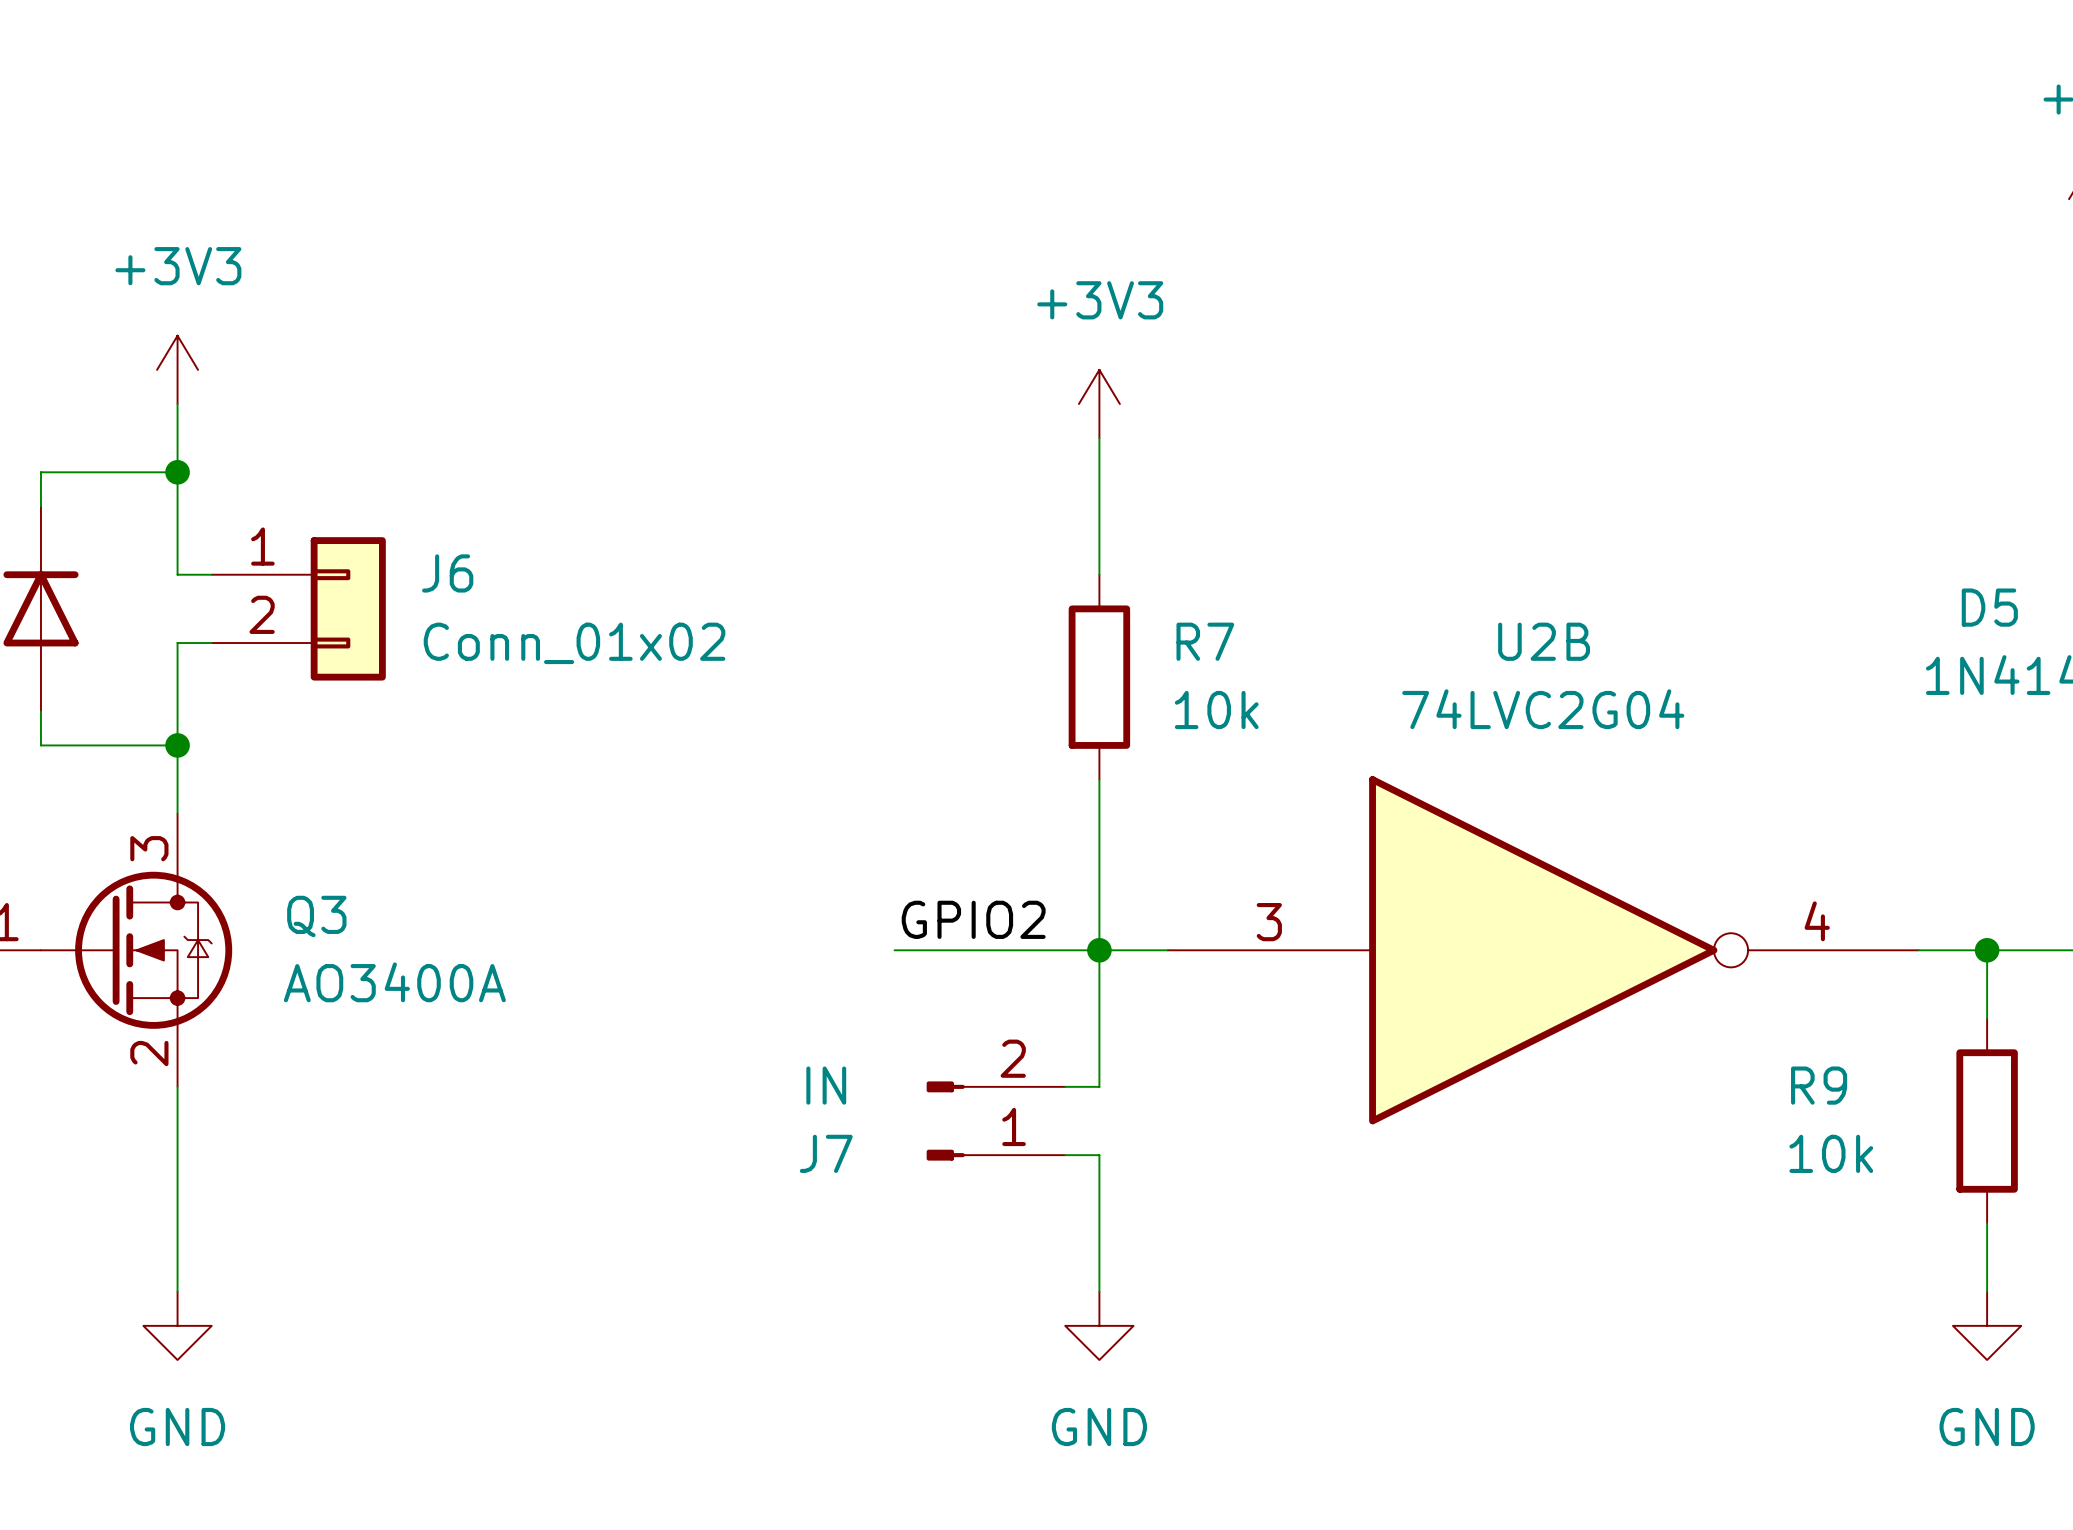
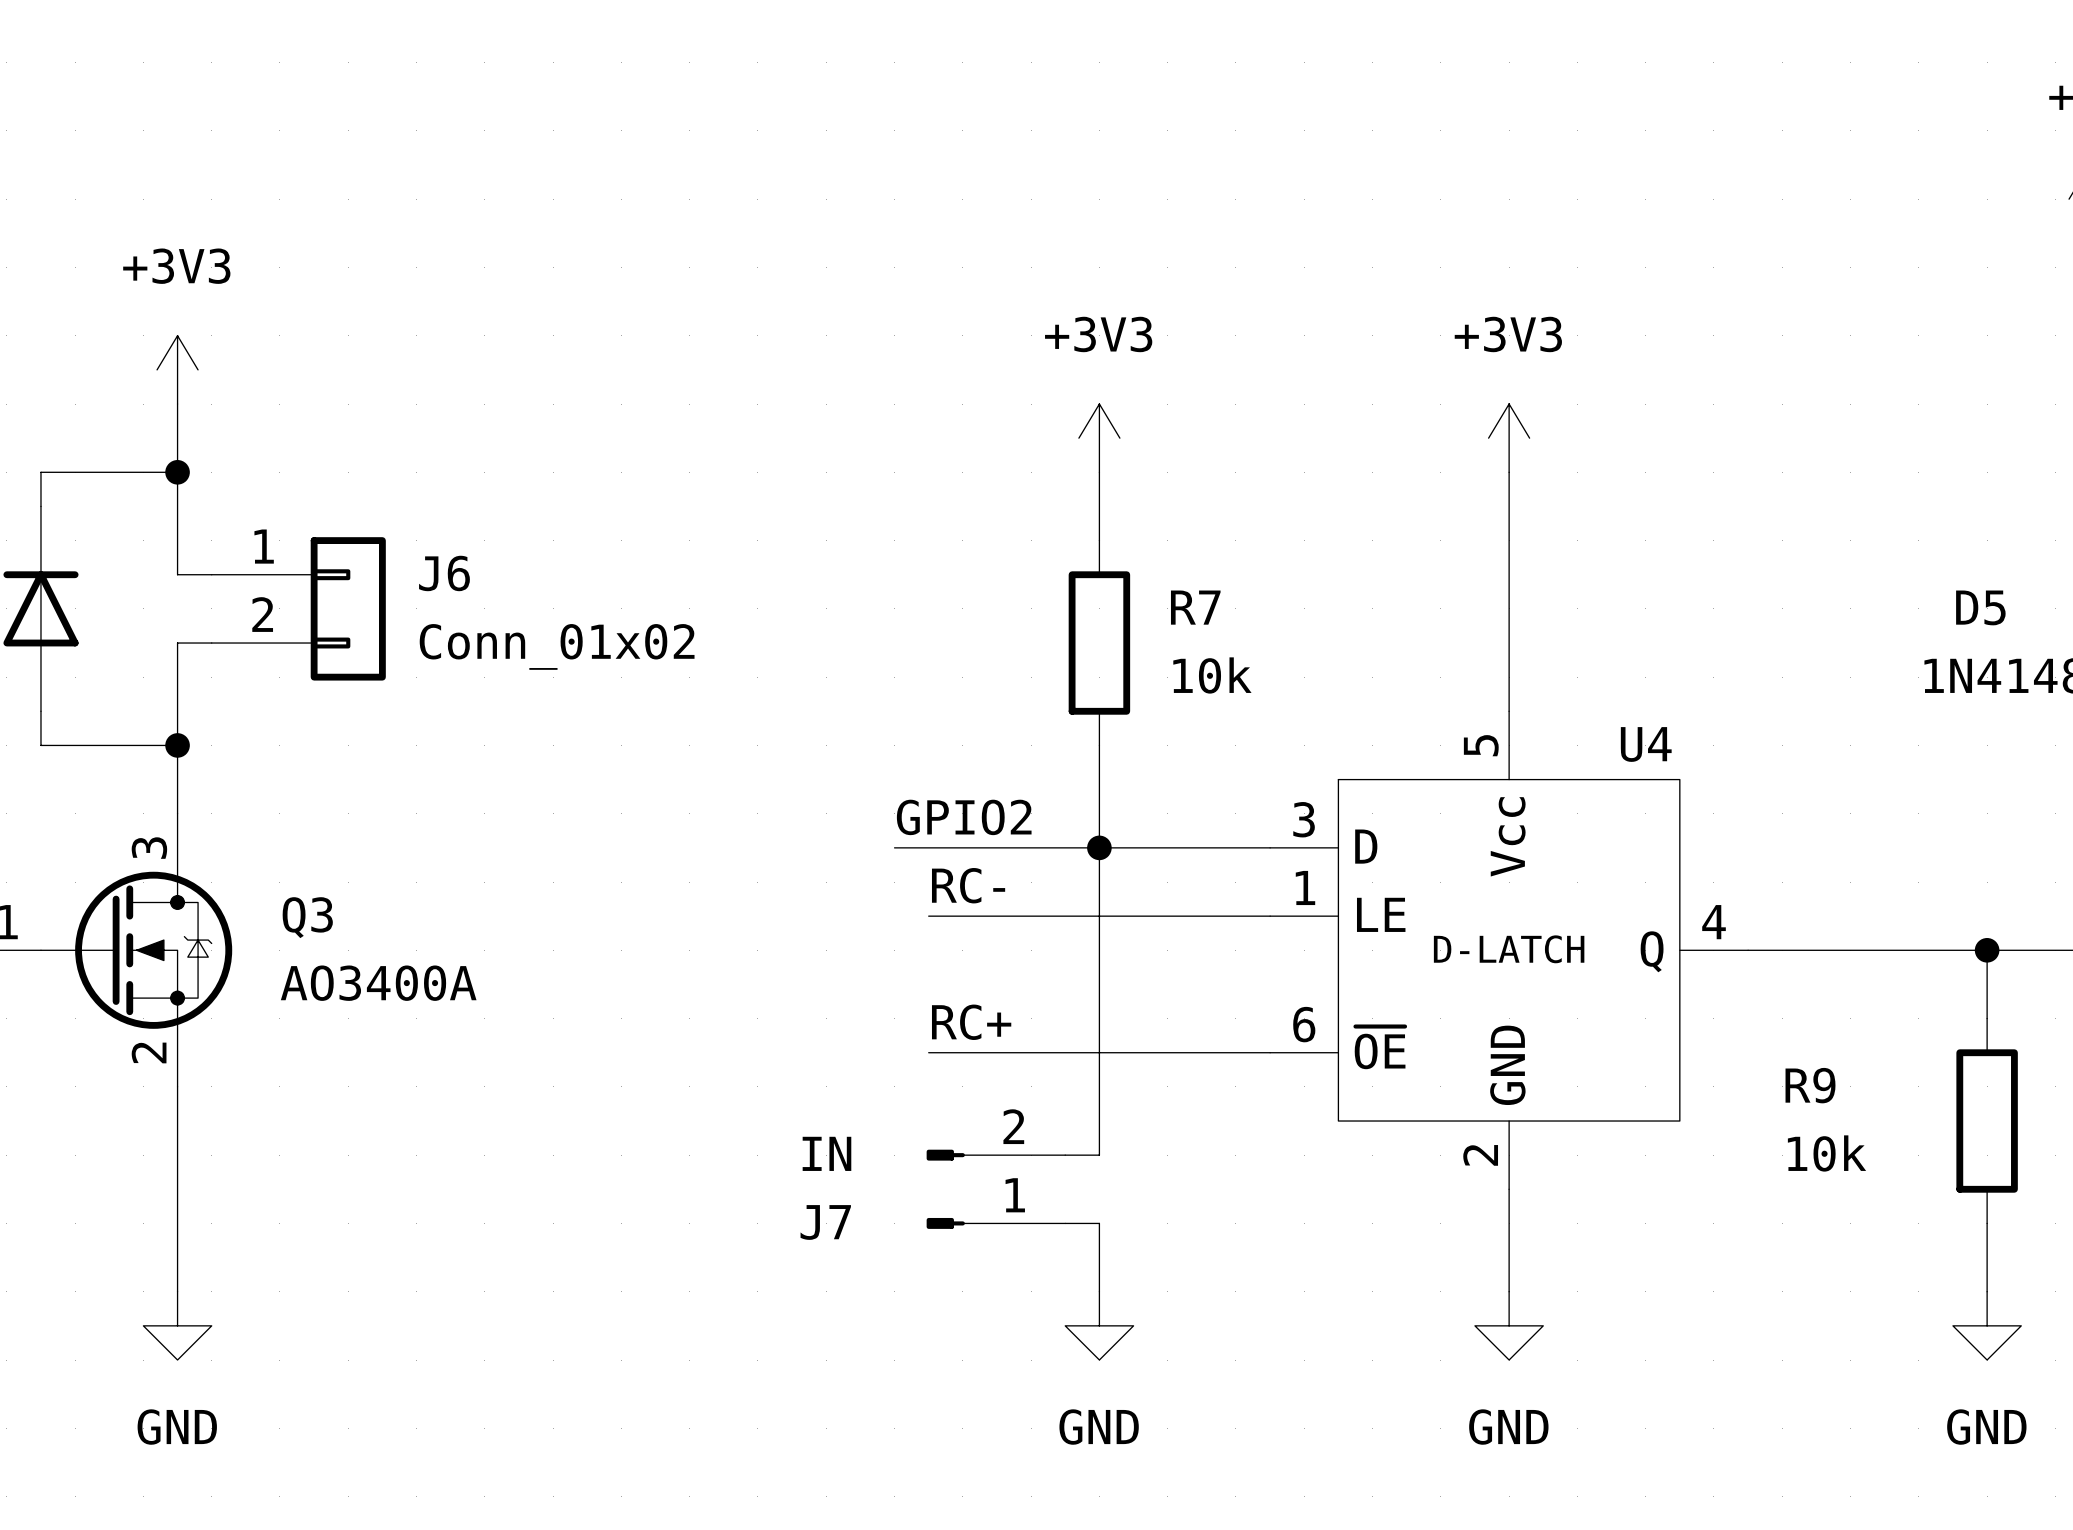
power symbol position: +3V3 (1099, 404) -> +3V3 (1099, 438)
power symbol: none -> +3V3 (1509, 438)
wire: none -> (1509, 472) (1509, 711)
R7 position: (1099, 677) -> (1099, 643)
wire: none -> (894, 847) (1270, 847)
label: none -> RC- (968, 885)
wire: none -> (928, 916) (1270, 916)
label position: GPIO2 (973, 919) -> GPIO2 (964, 817)
wire: (894, 950) (1167, 950) -> none
junction position: (1099, 950) -> (1099, 847)
U4: none -> (1509, 950)
U2B: 74LVC2G04 (1543, 950) -> none
label: none -> RC+ (971, 1022)
wire: none -> (928, 1052) (1270, 1052)
wire: (1065, 1086) (1099, 1086) -> (1099, 1155) (1099, 1086)
J7 position: (995, 1121) -> (995, 1189)
wire: (1099, 1155) (1099, 1223) -> (1065, 1223) (1099, 1223)
wire: none -> (1509, 1189) (1509, 1291)
power symbol: none -> GND (1509, 1325)

